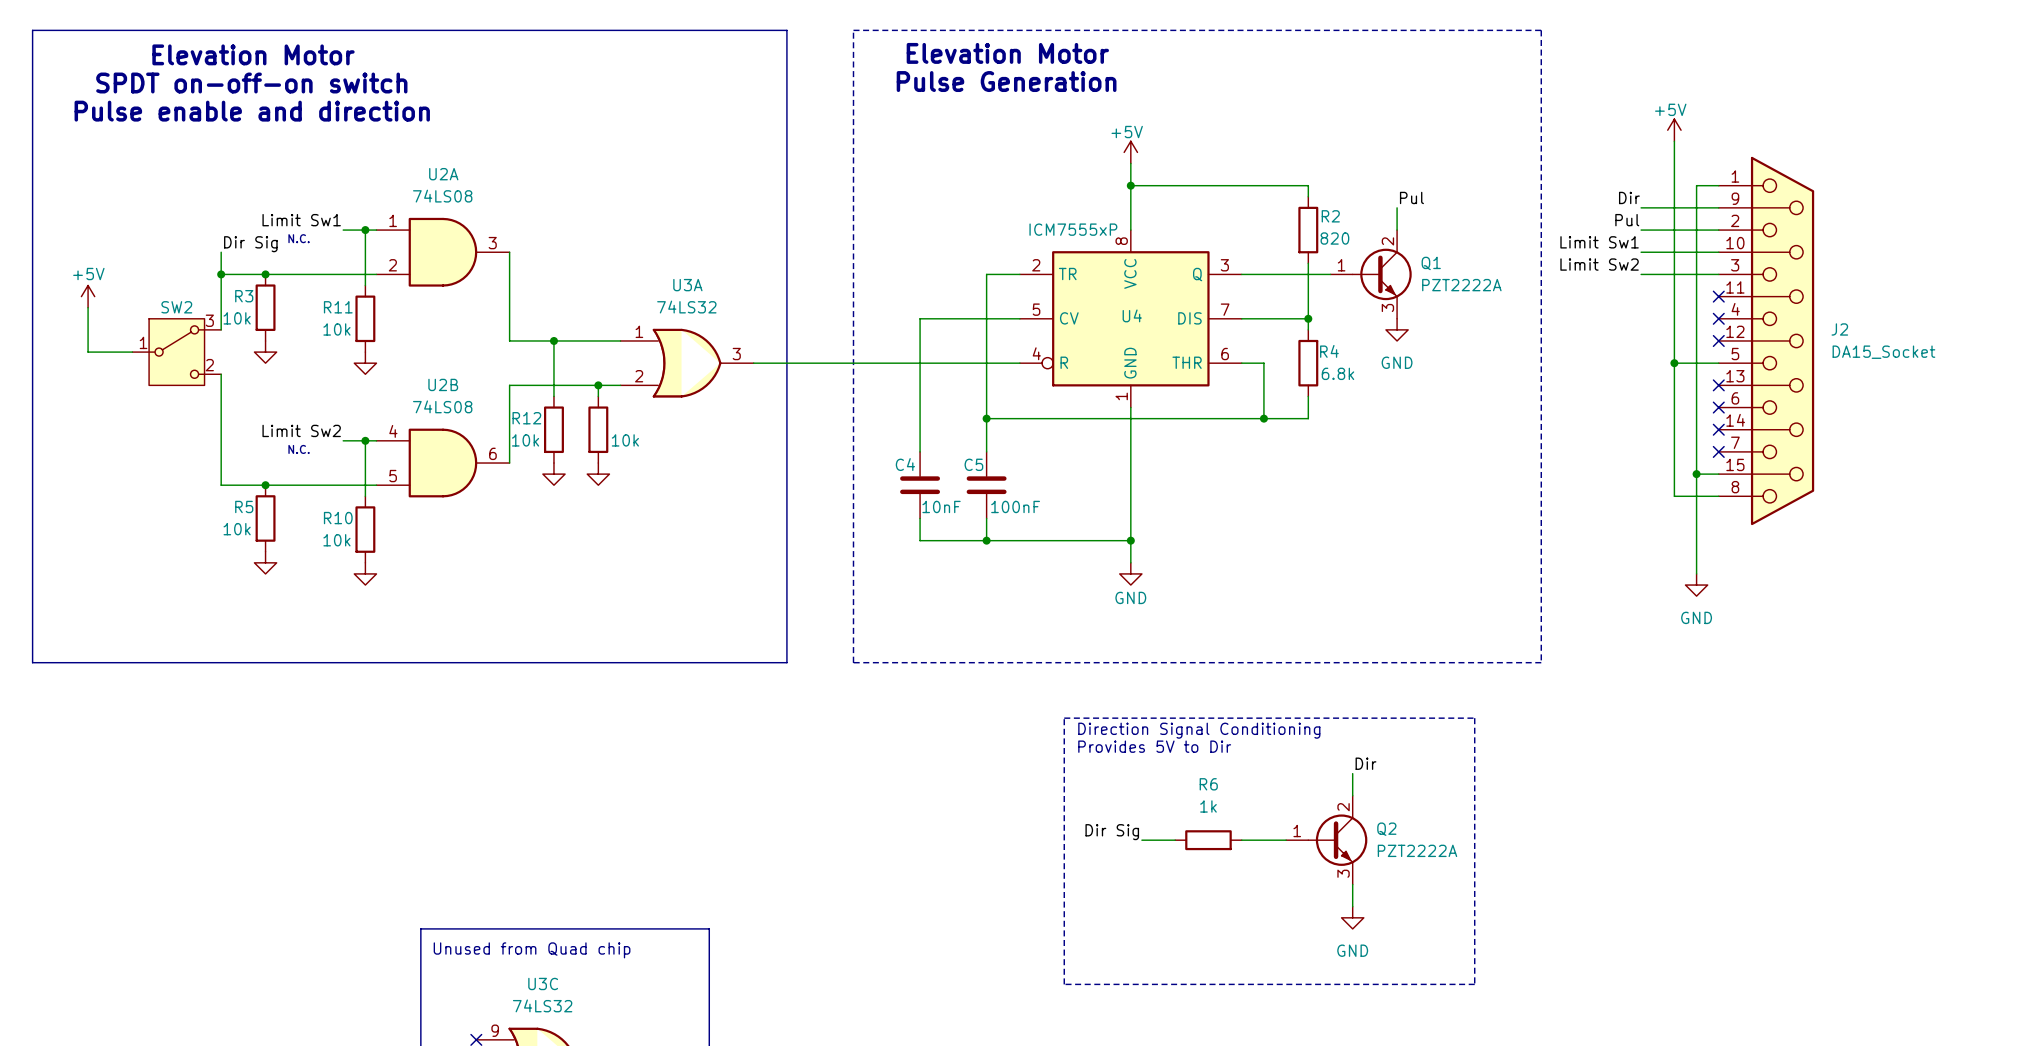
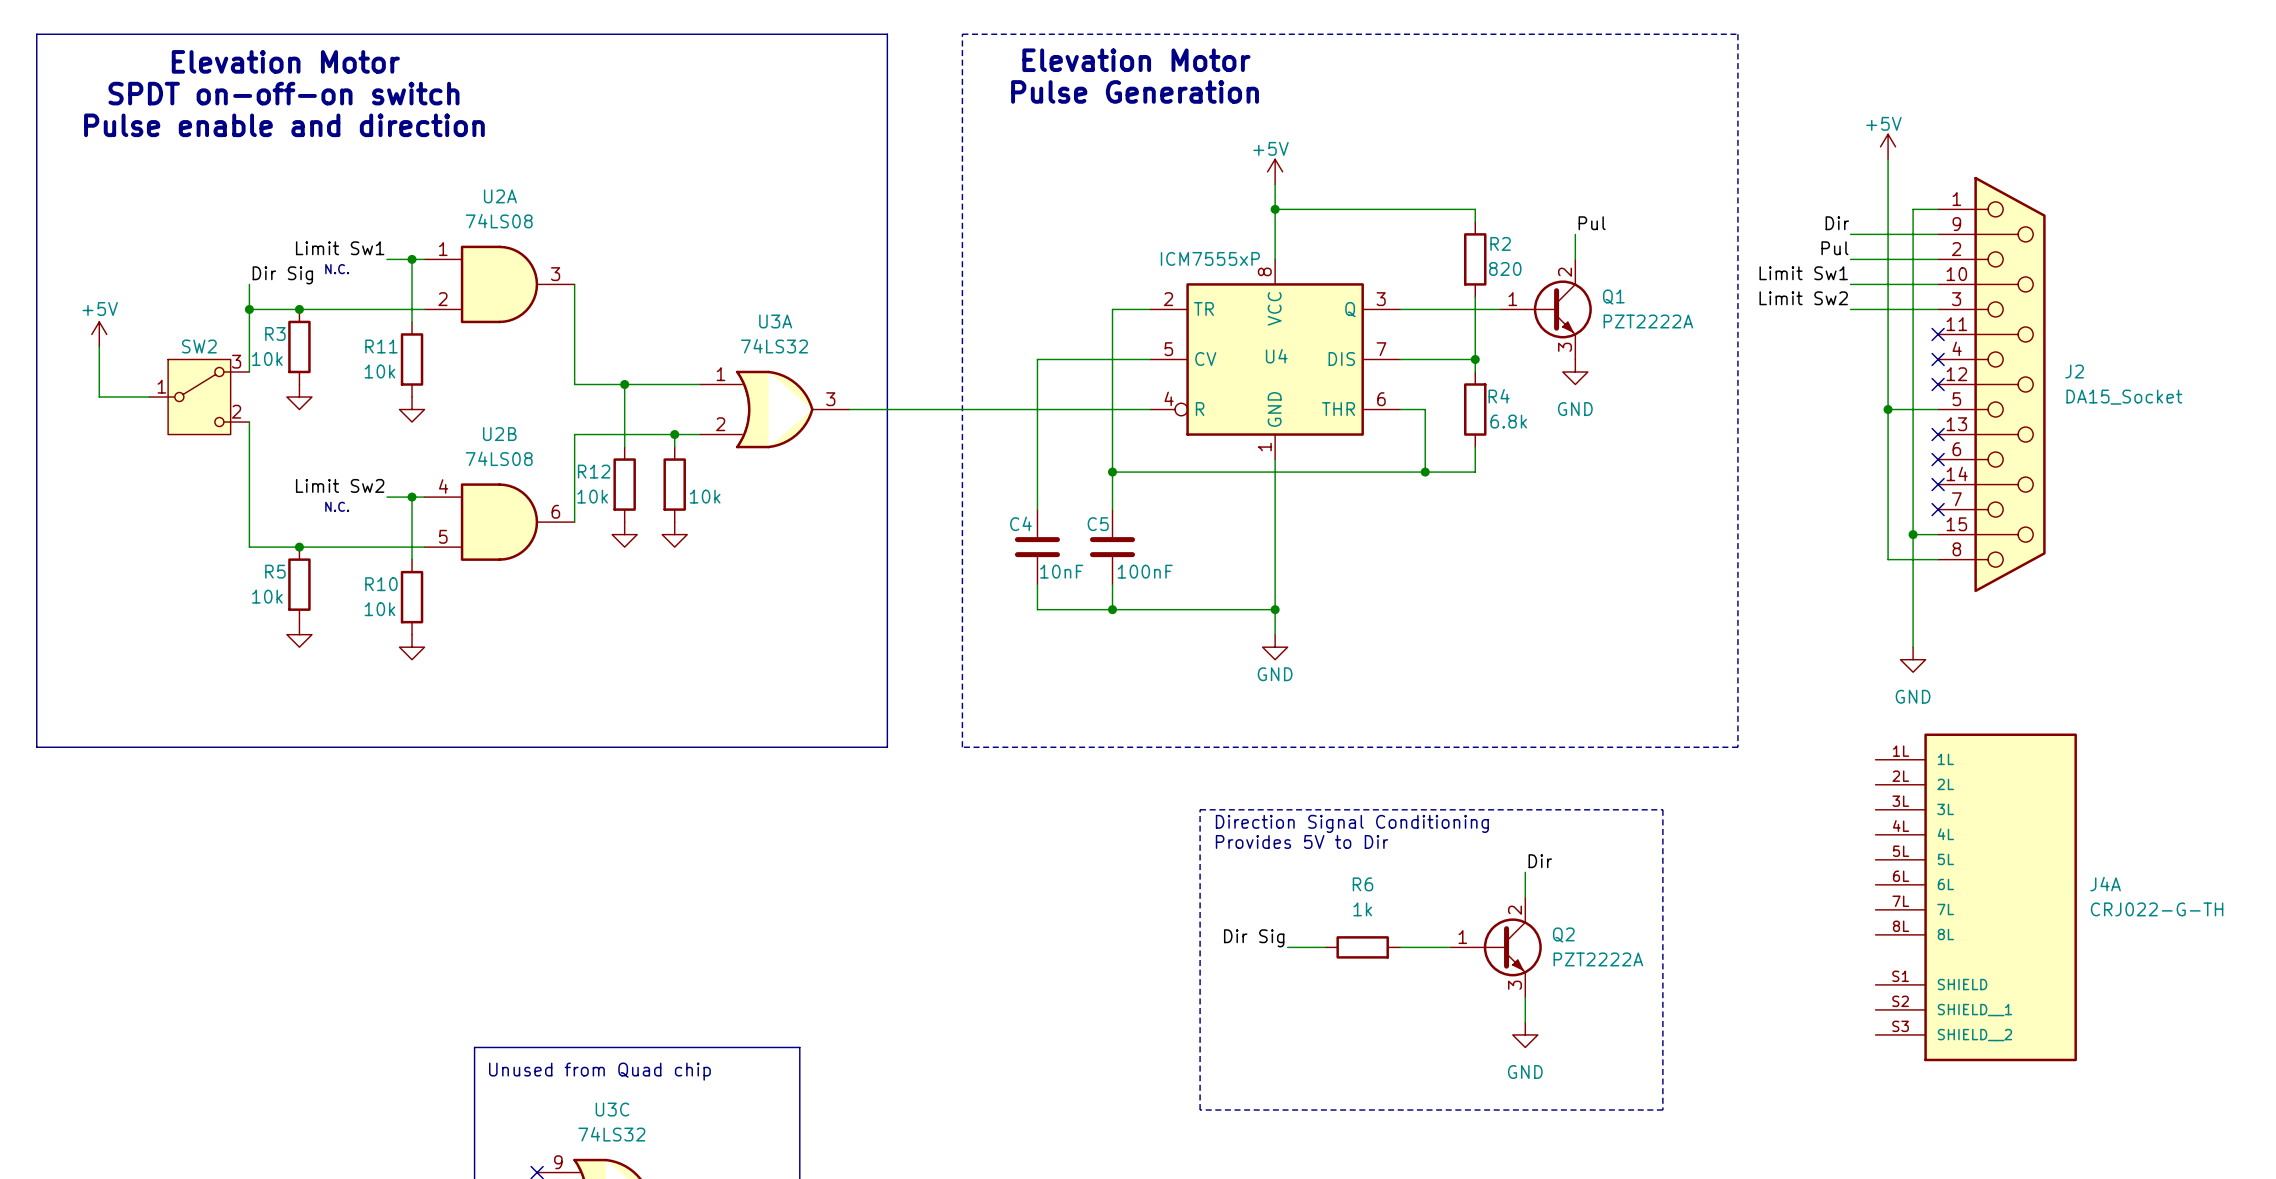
J4A: none -> CRJ022-G-TH (1976, 897)

